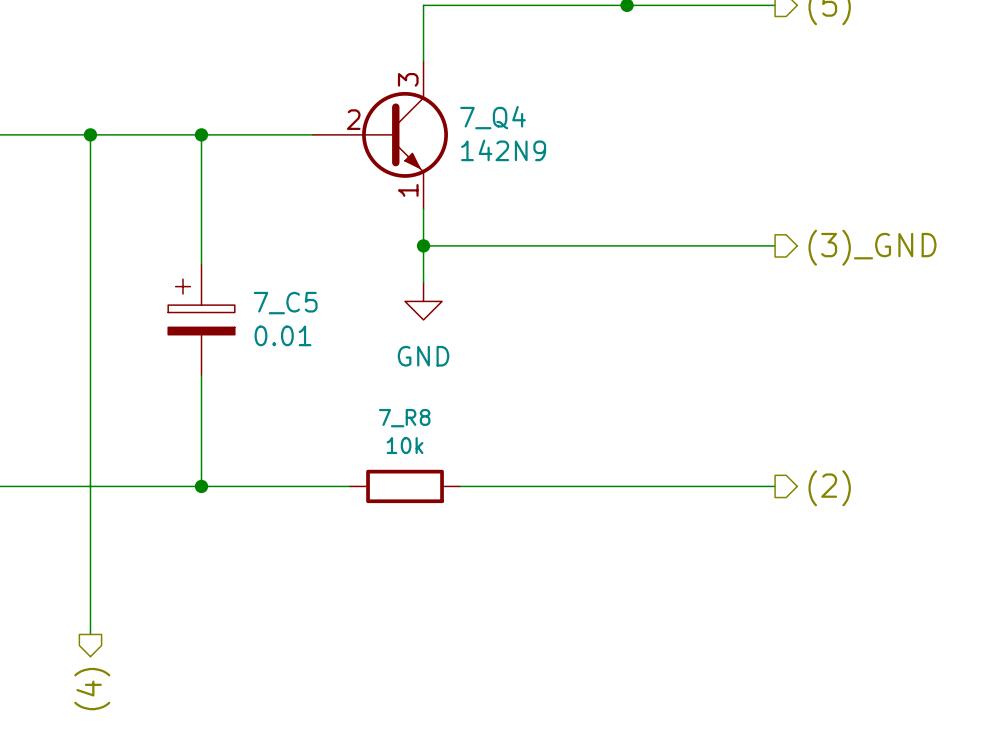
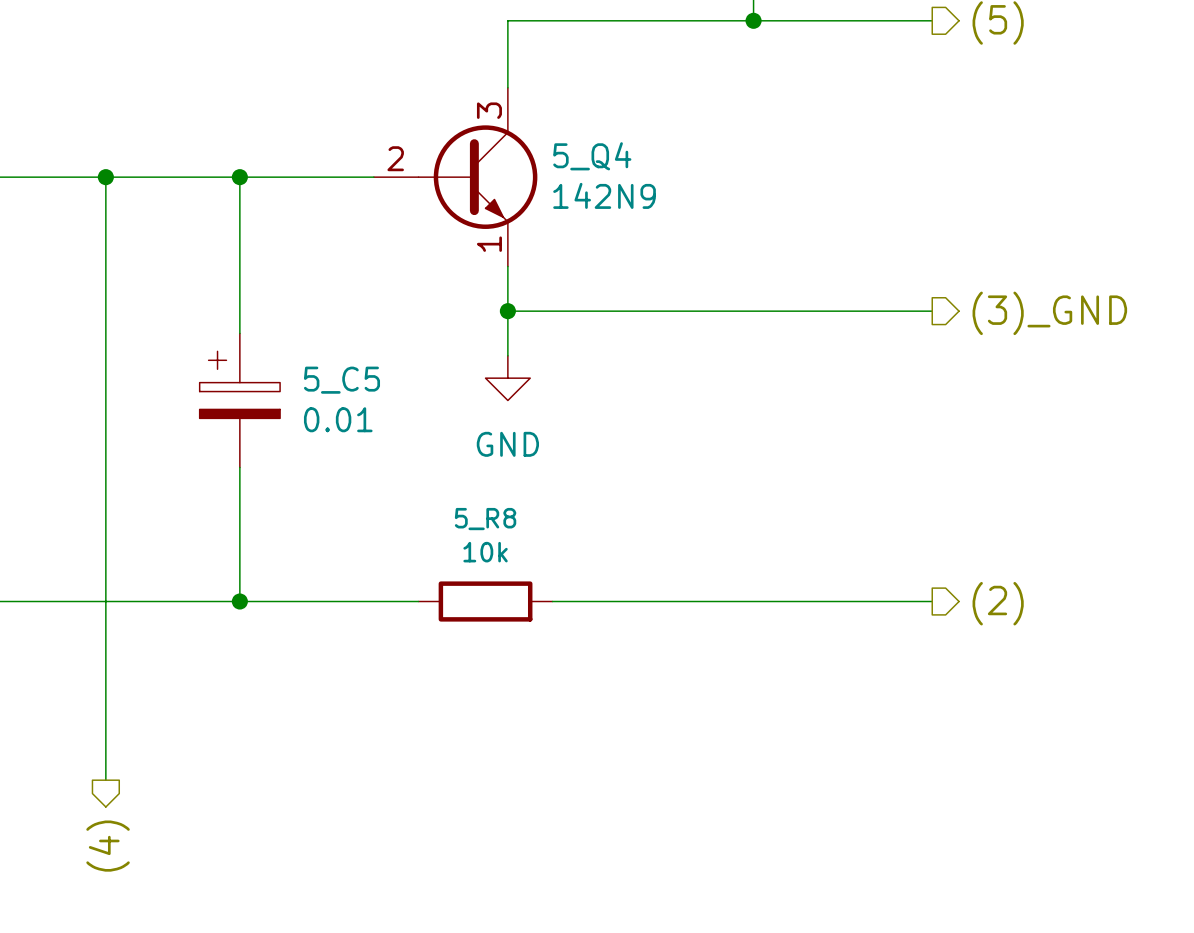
7_Q4: 142N9 (380, 134) -> none
5_Q4: none -> 142N9 (455, 177)
7_C5 name: 7_C5 (285, 303) -> 5_C5 (341, 380)
7_R8 name: 7_R8 (404, 418) -> 5_R8 (485, 519)

